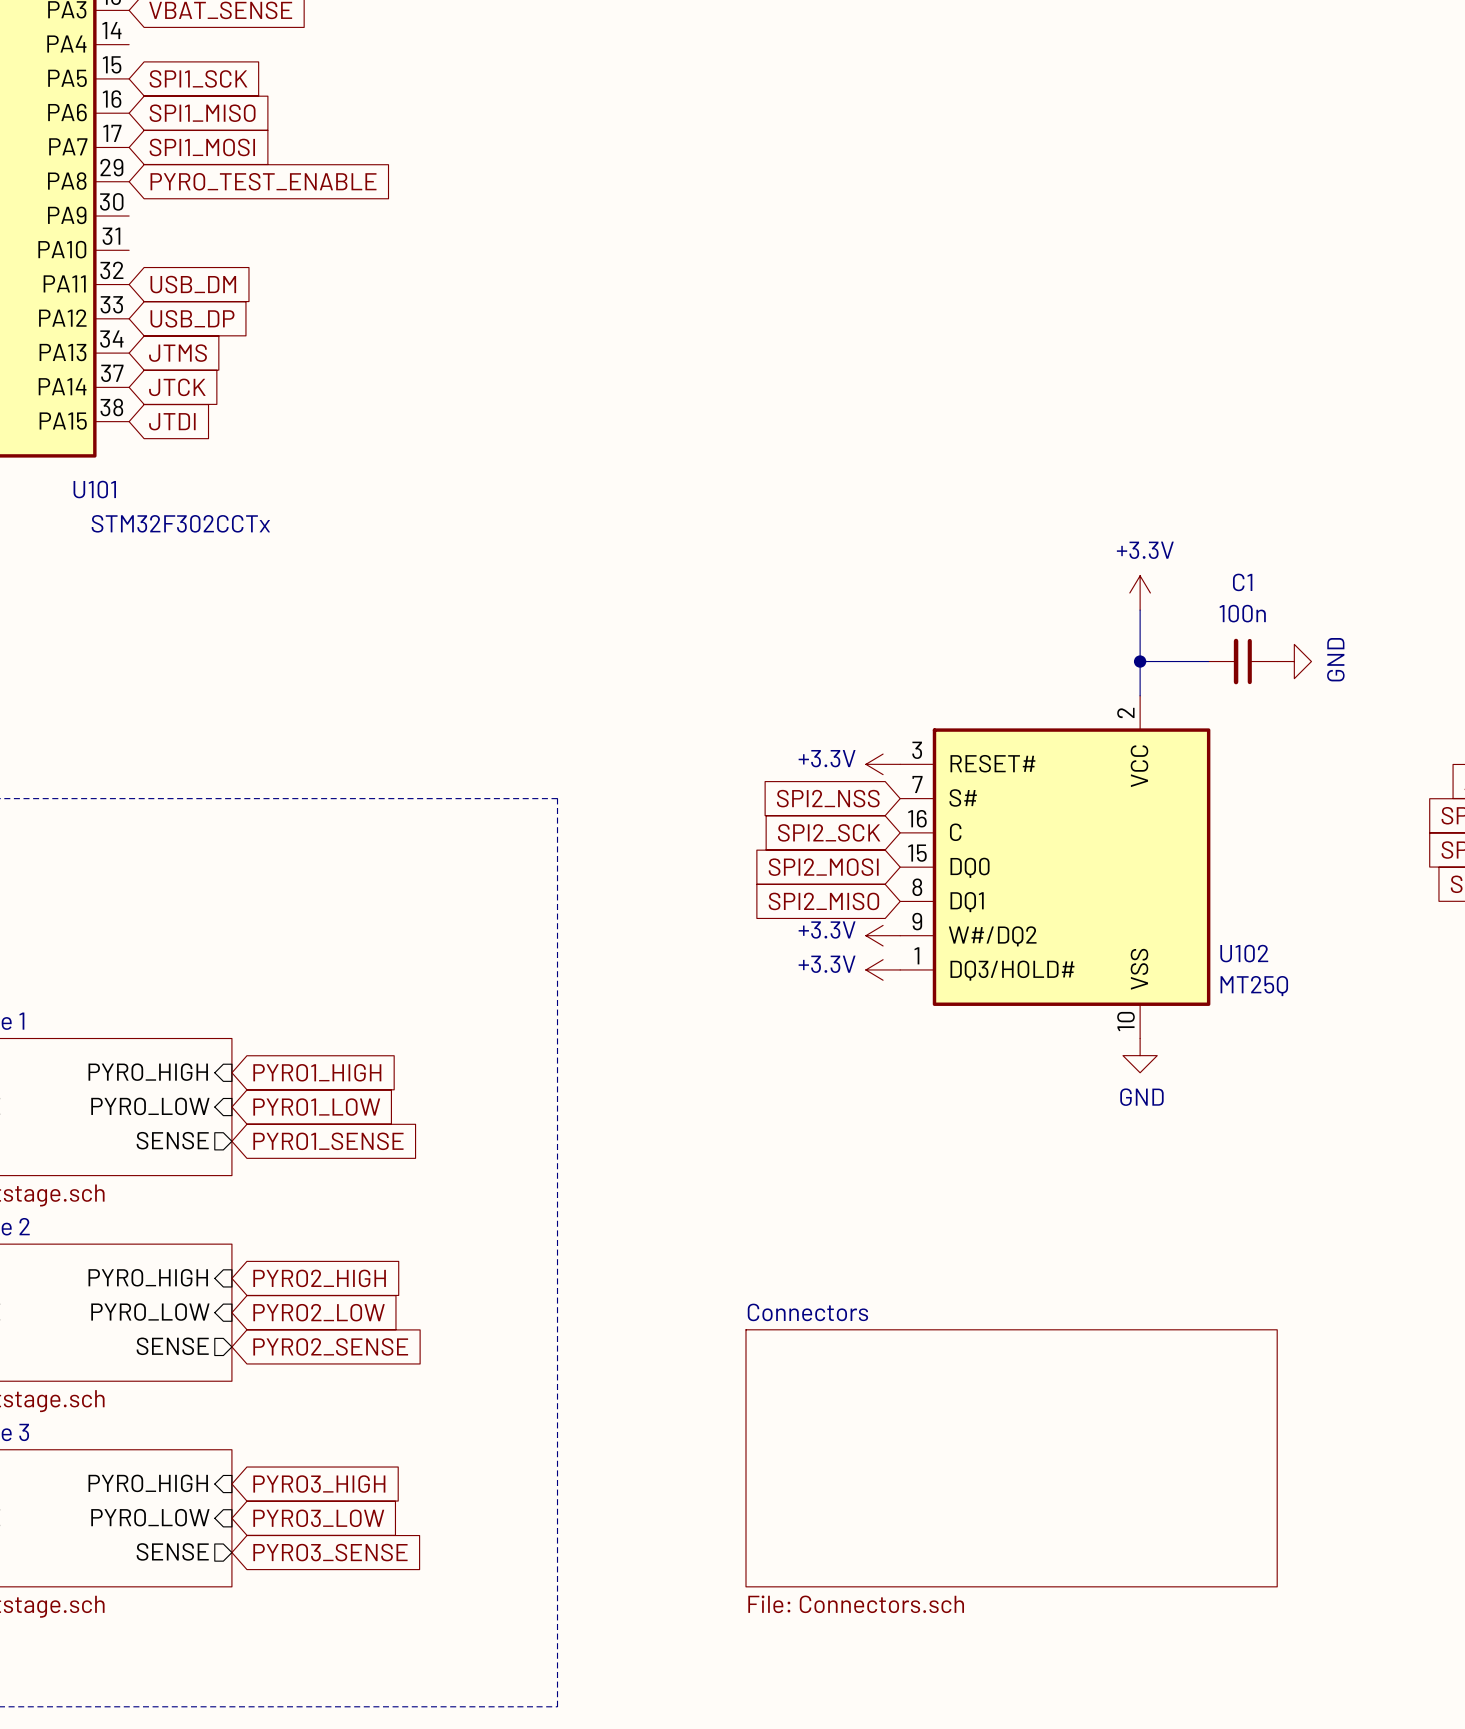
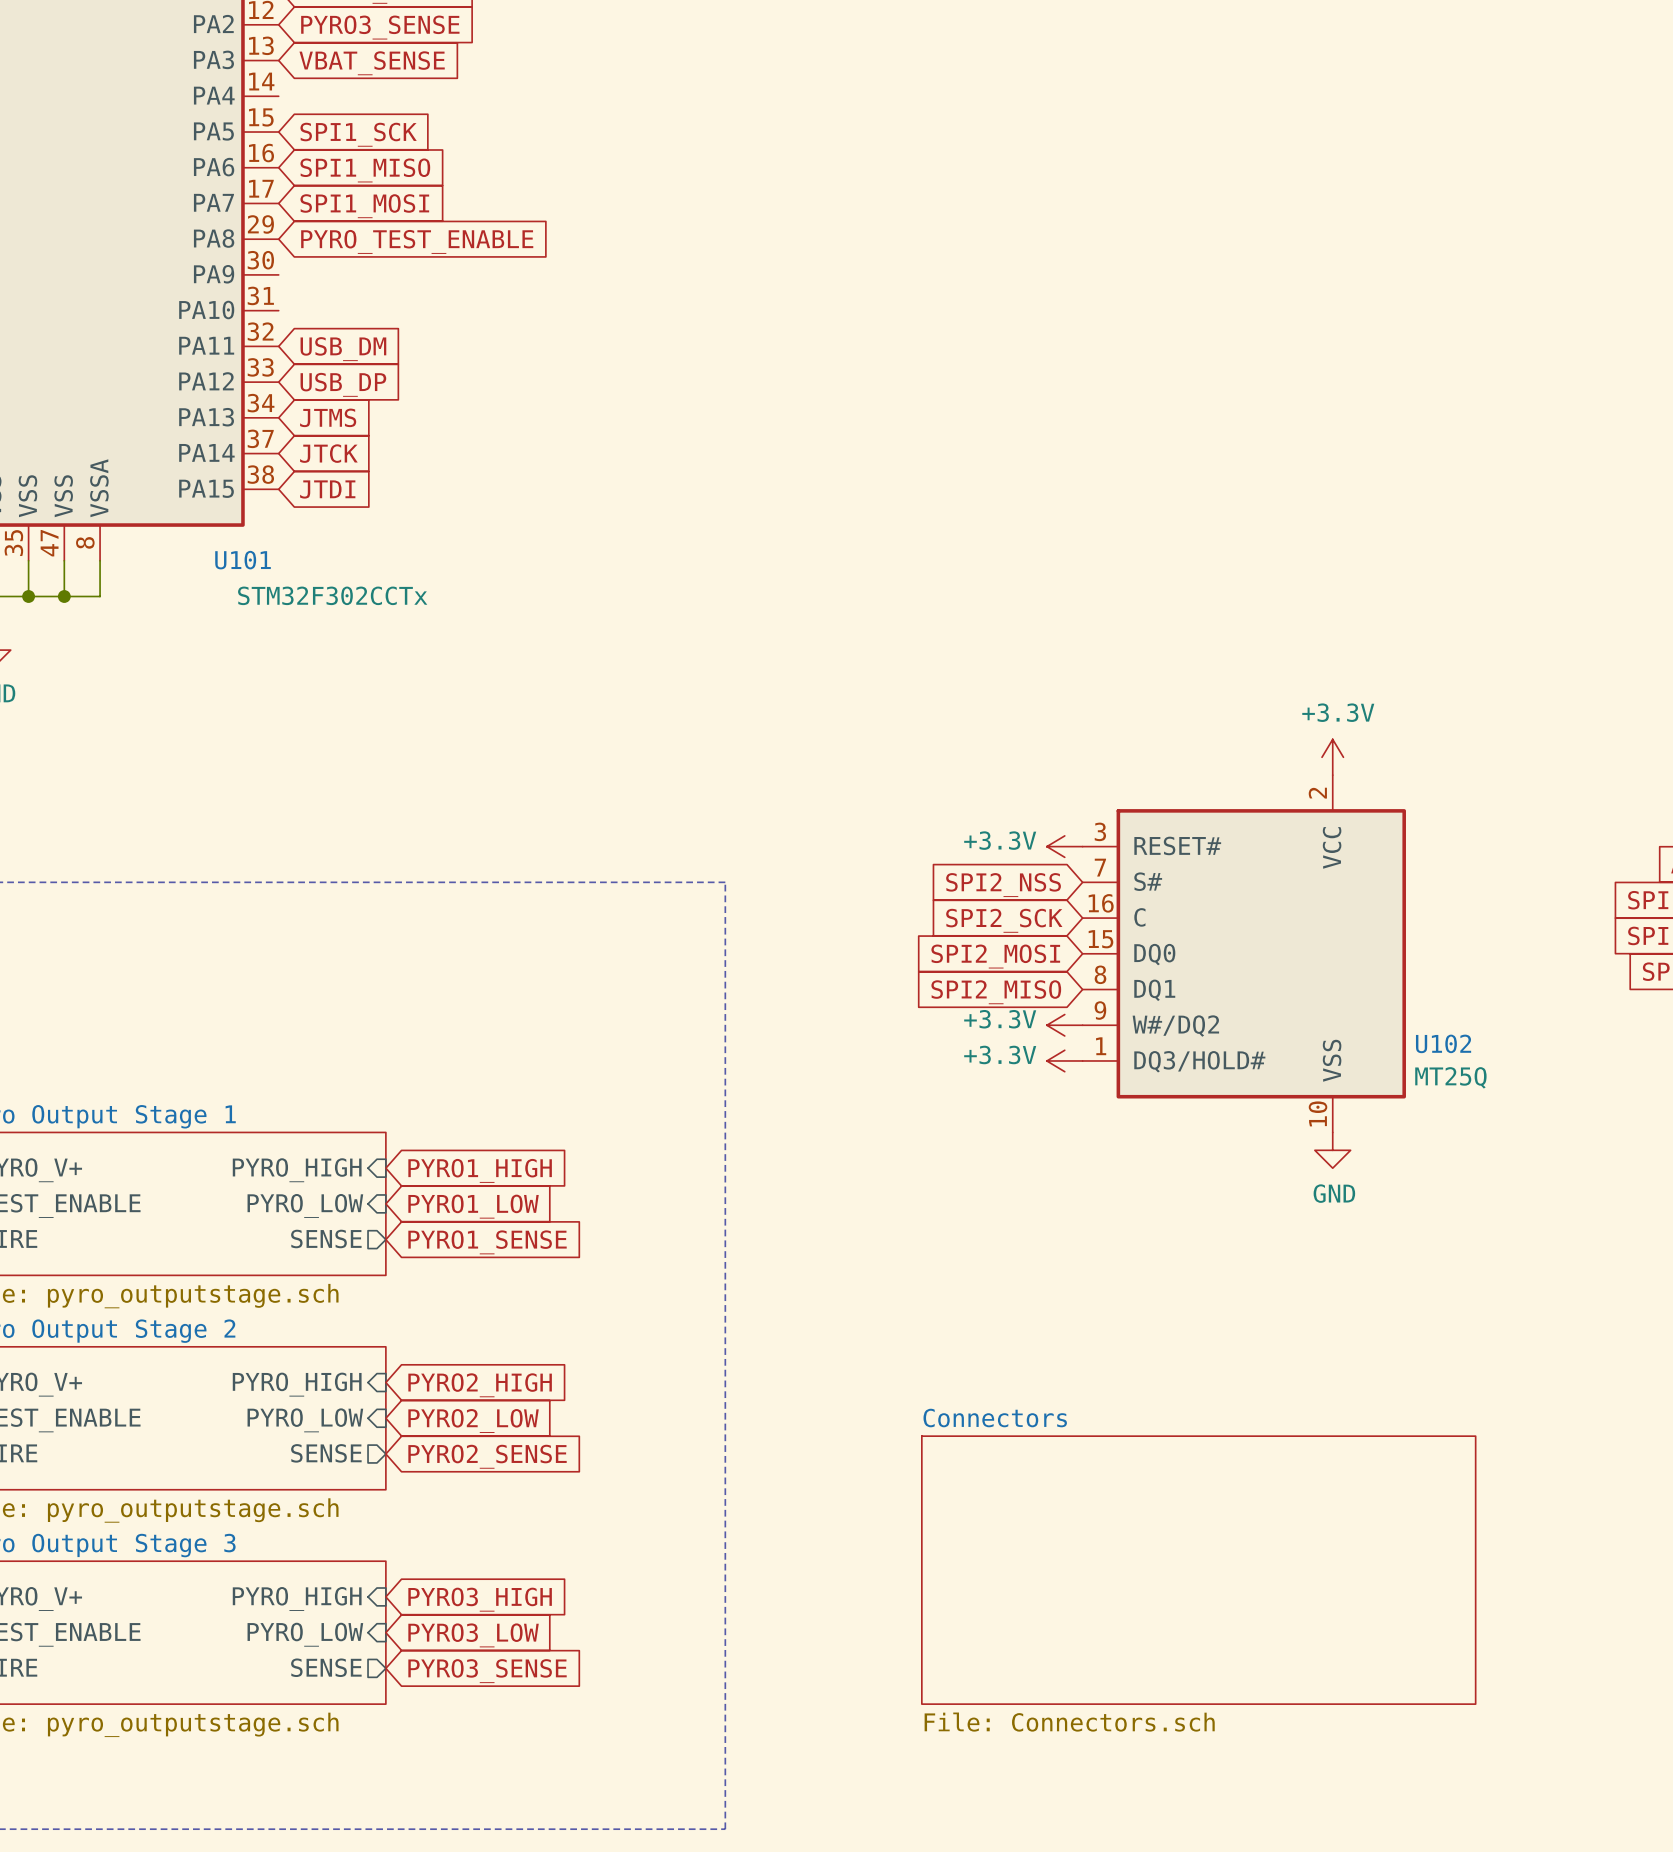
power symbol position: +3.3V (1140, 592) -> +3.3V (1332, 757)
wire: (1140, 610) (1140, 695) -> none
wire: (1140, 661) (1208, 661) -> none
junction: (1140, 661) -> none
C1: 100n (1242, 661) -> none
power symbol: GND (1294, 661) -> none

